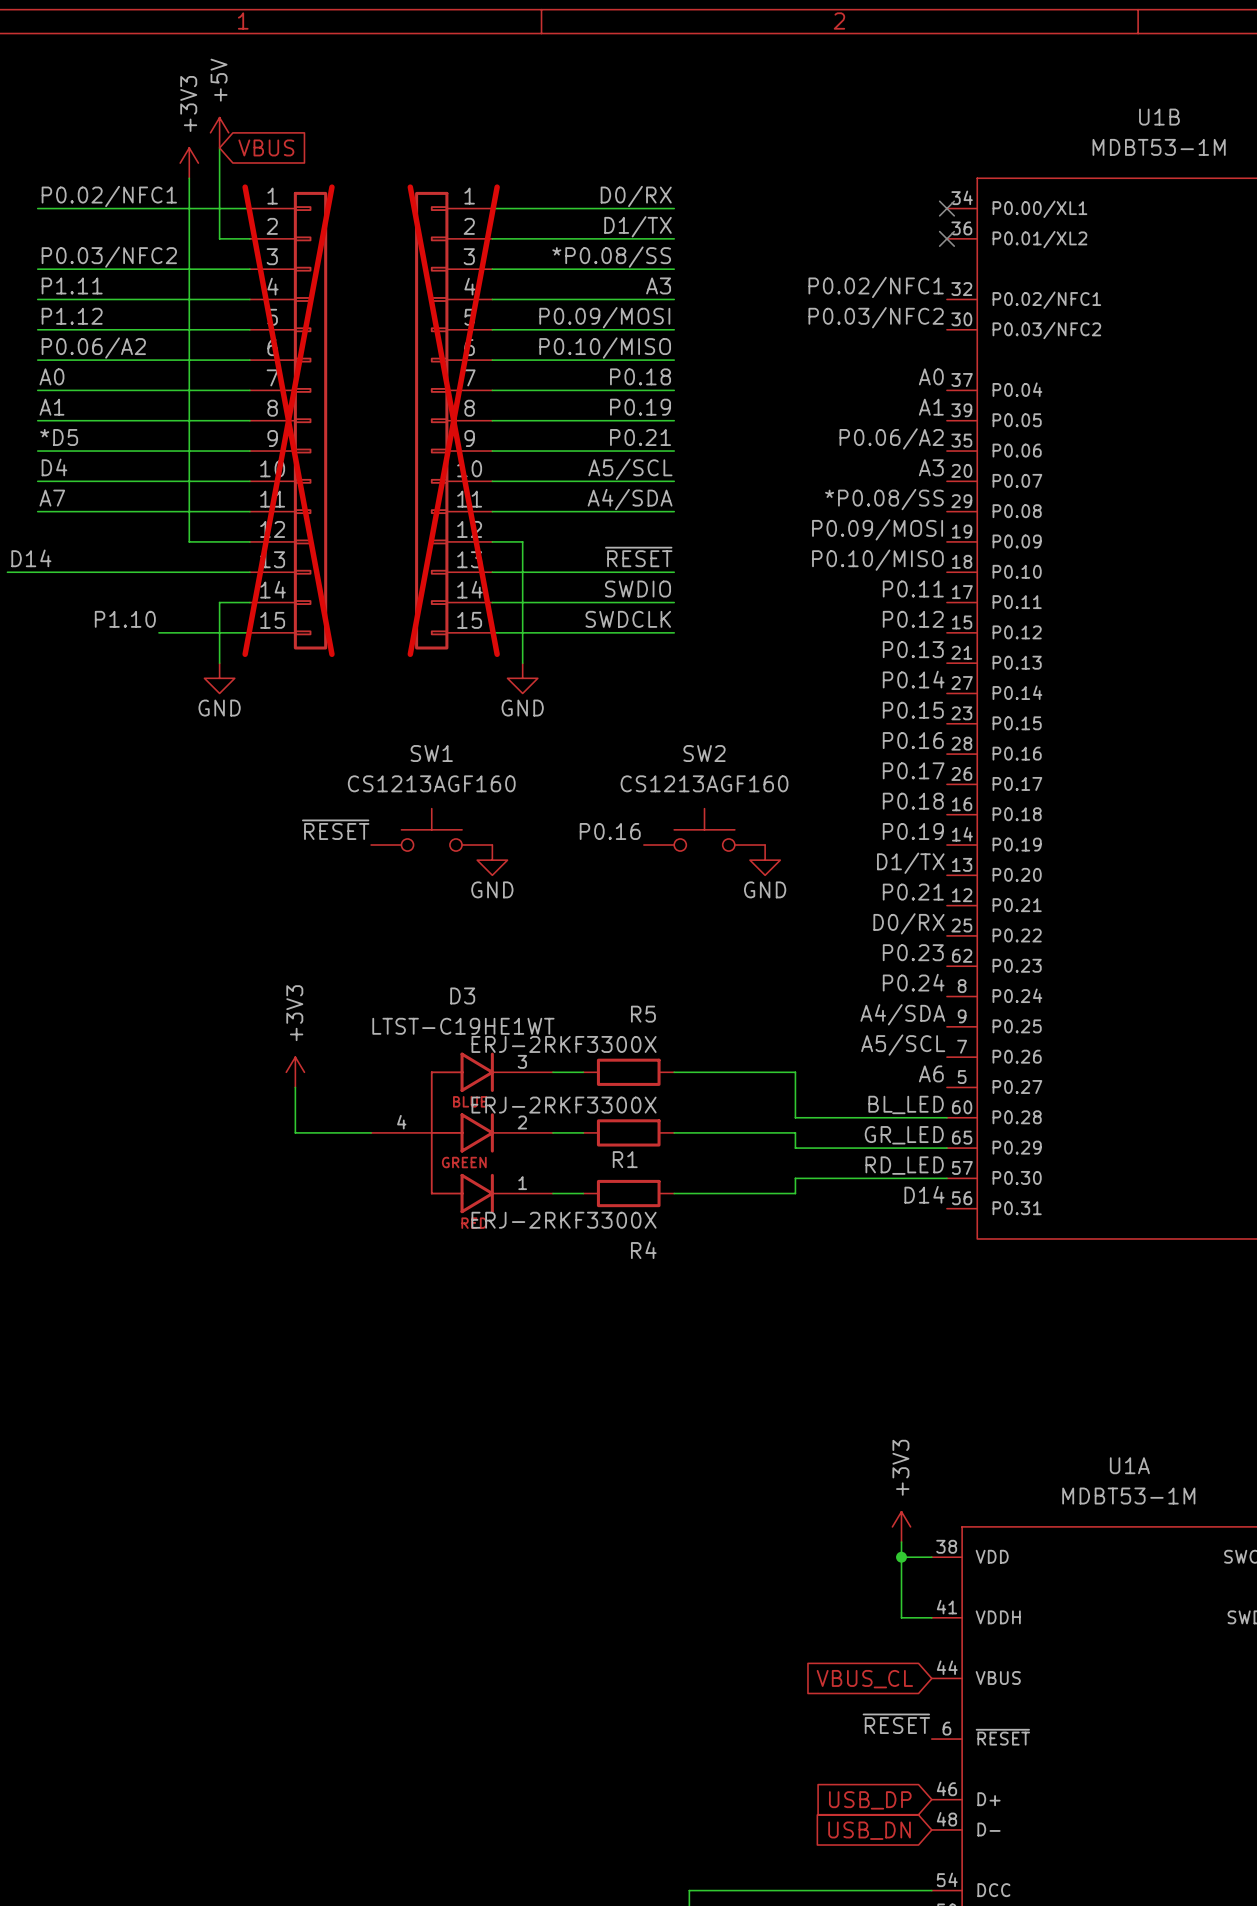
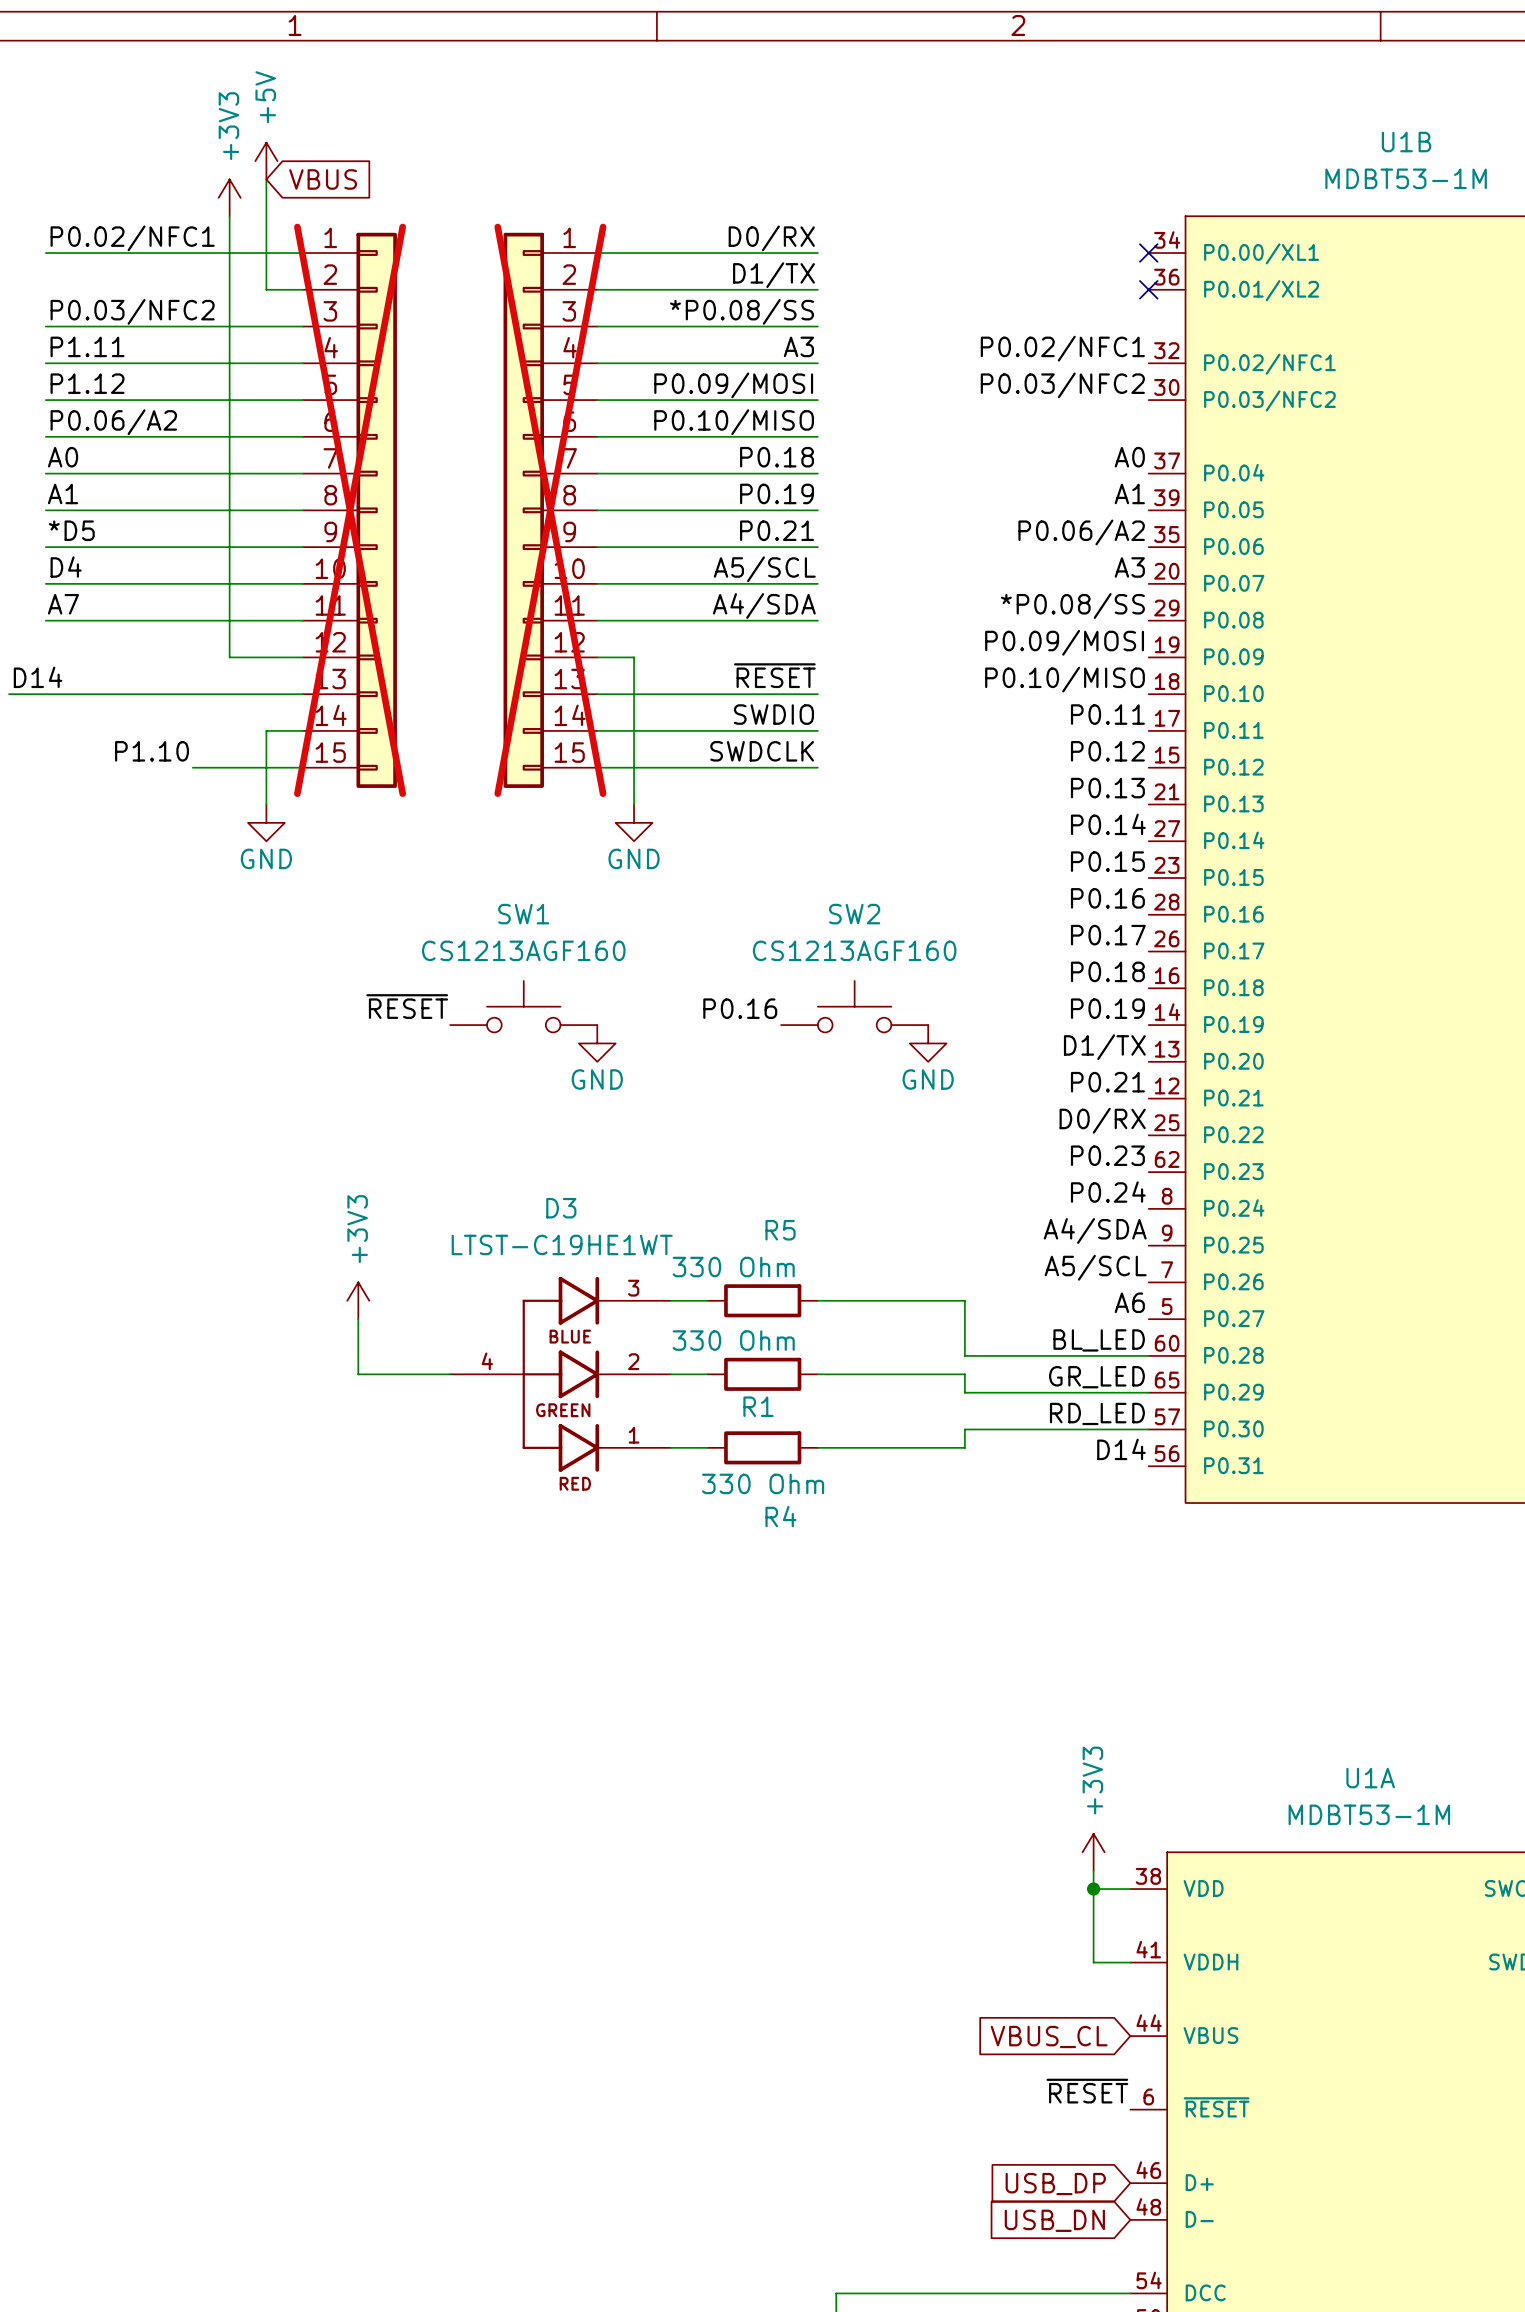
R5 value: ERJ-2RKF3300X (564, 1044) -> 330 Ohm (733, 1267)
R1 value: ERJ-2RKF3300X (564, 1105) -> 330 Ohm (733, 1340)
R4 value: ERJ-2RKF3300X (564, 1220) -> 330 Ohm (763, 1483)

